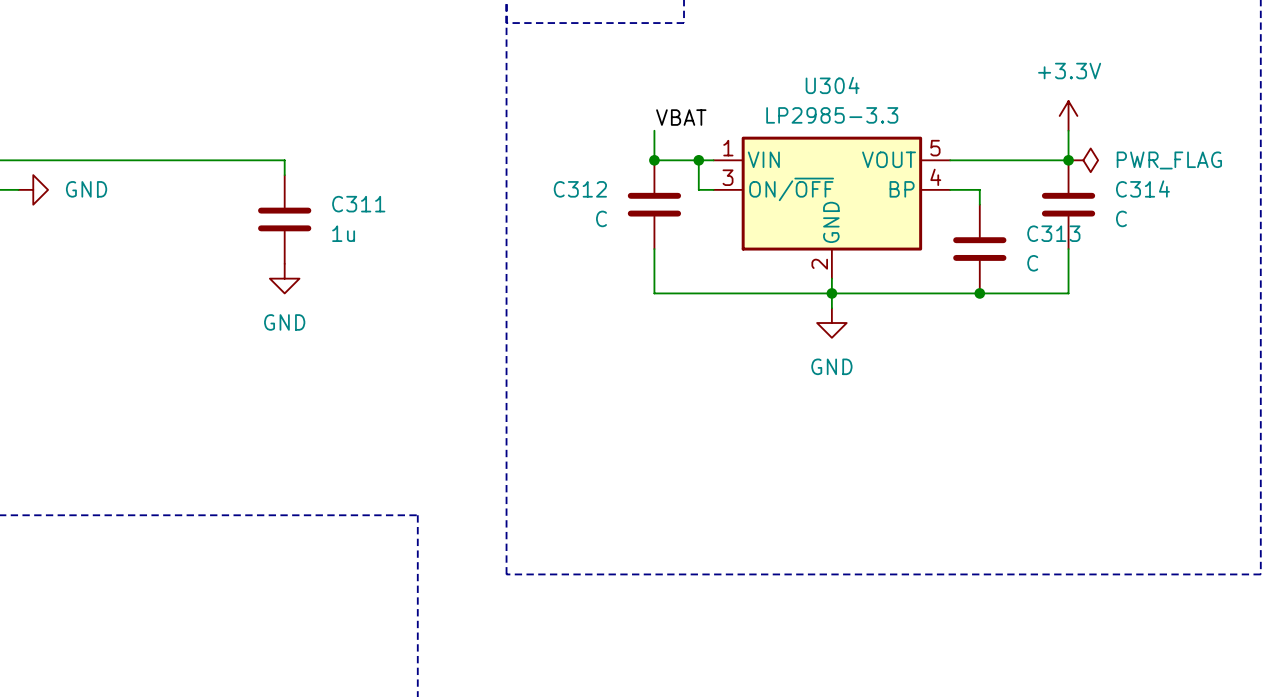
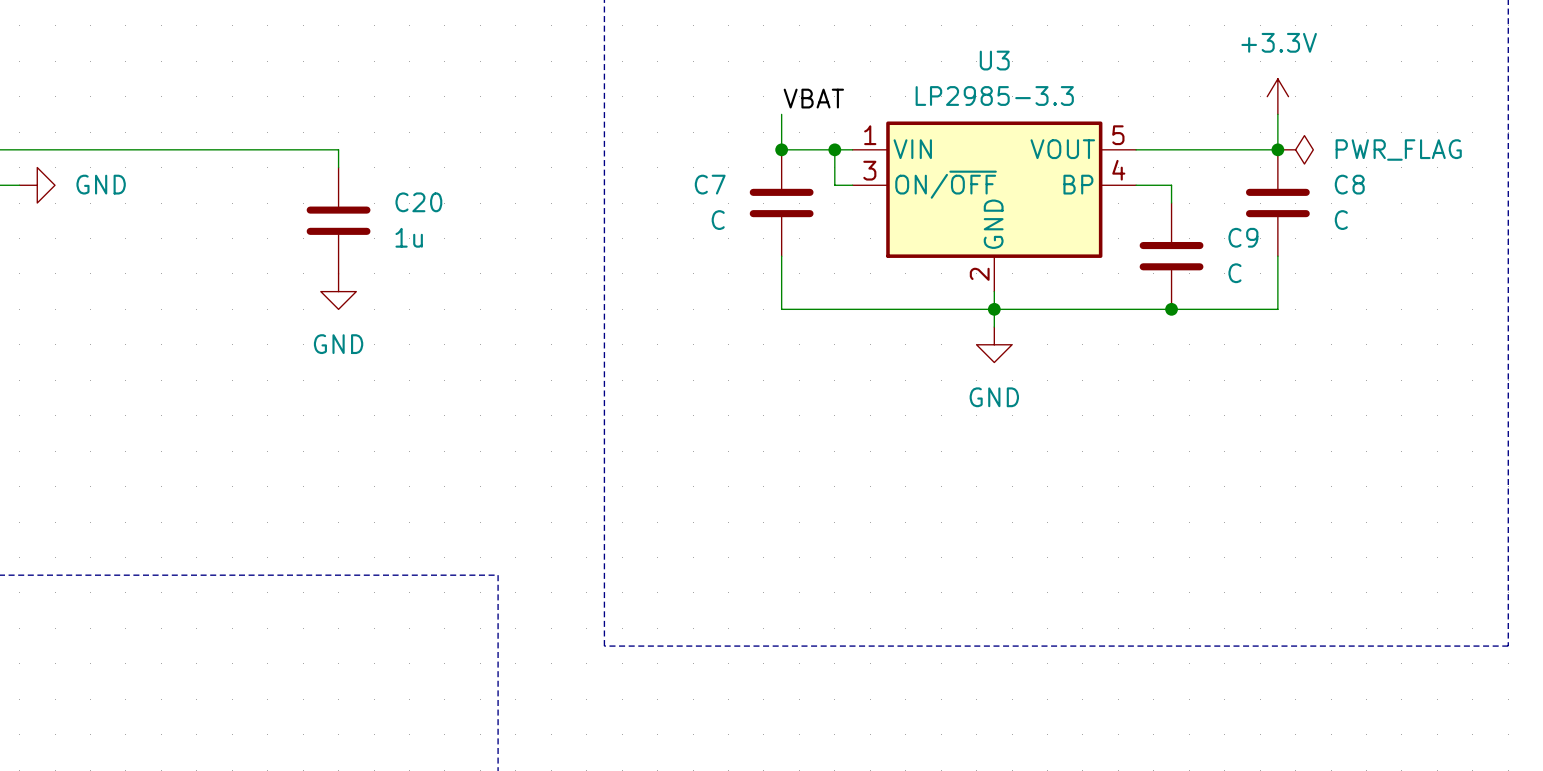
U304 name: U304 (832, 85) -> U3 (994, 60)
C314 name: C314 (1142, 188) -> C8 (1349, 184)
C312 name: C312 (580, 189) -> C7 (710, 184)
C311 name: C311 (358, 204) -> C20 (418, 202)
C313 name: C313 (1053, 233) -> C9 (1243, 237)

